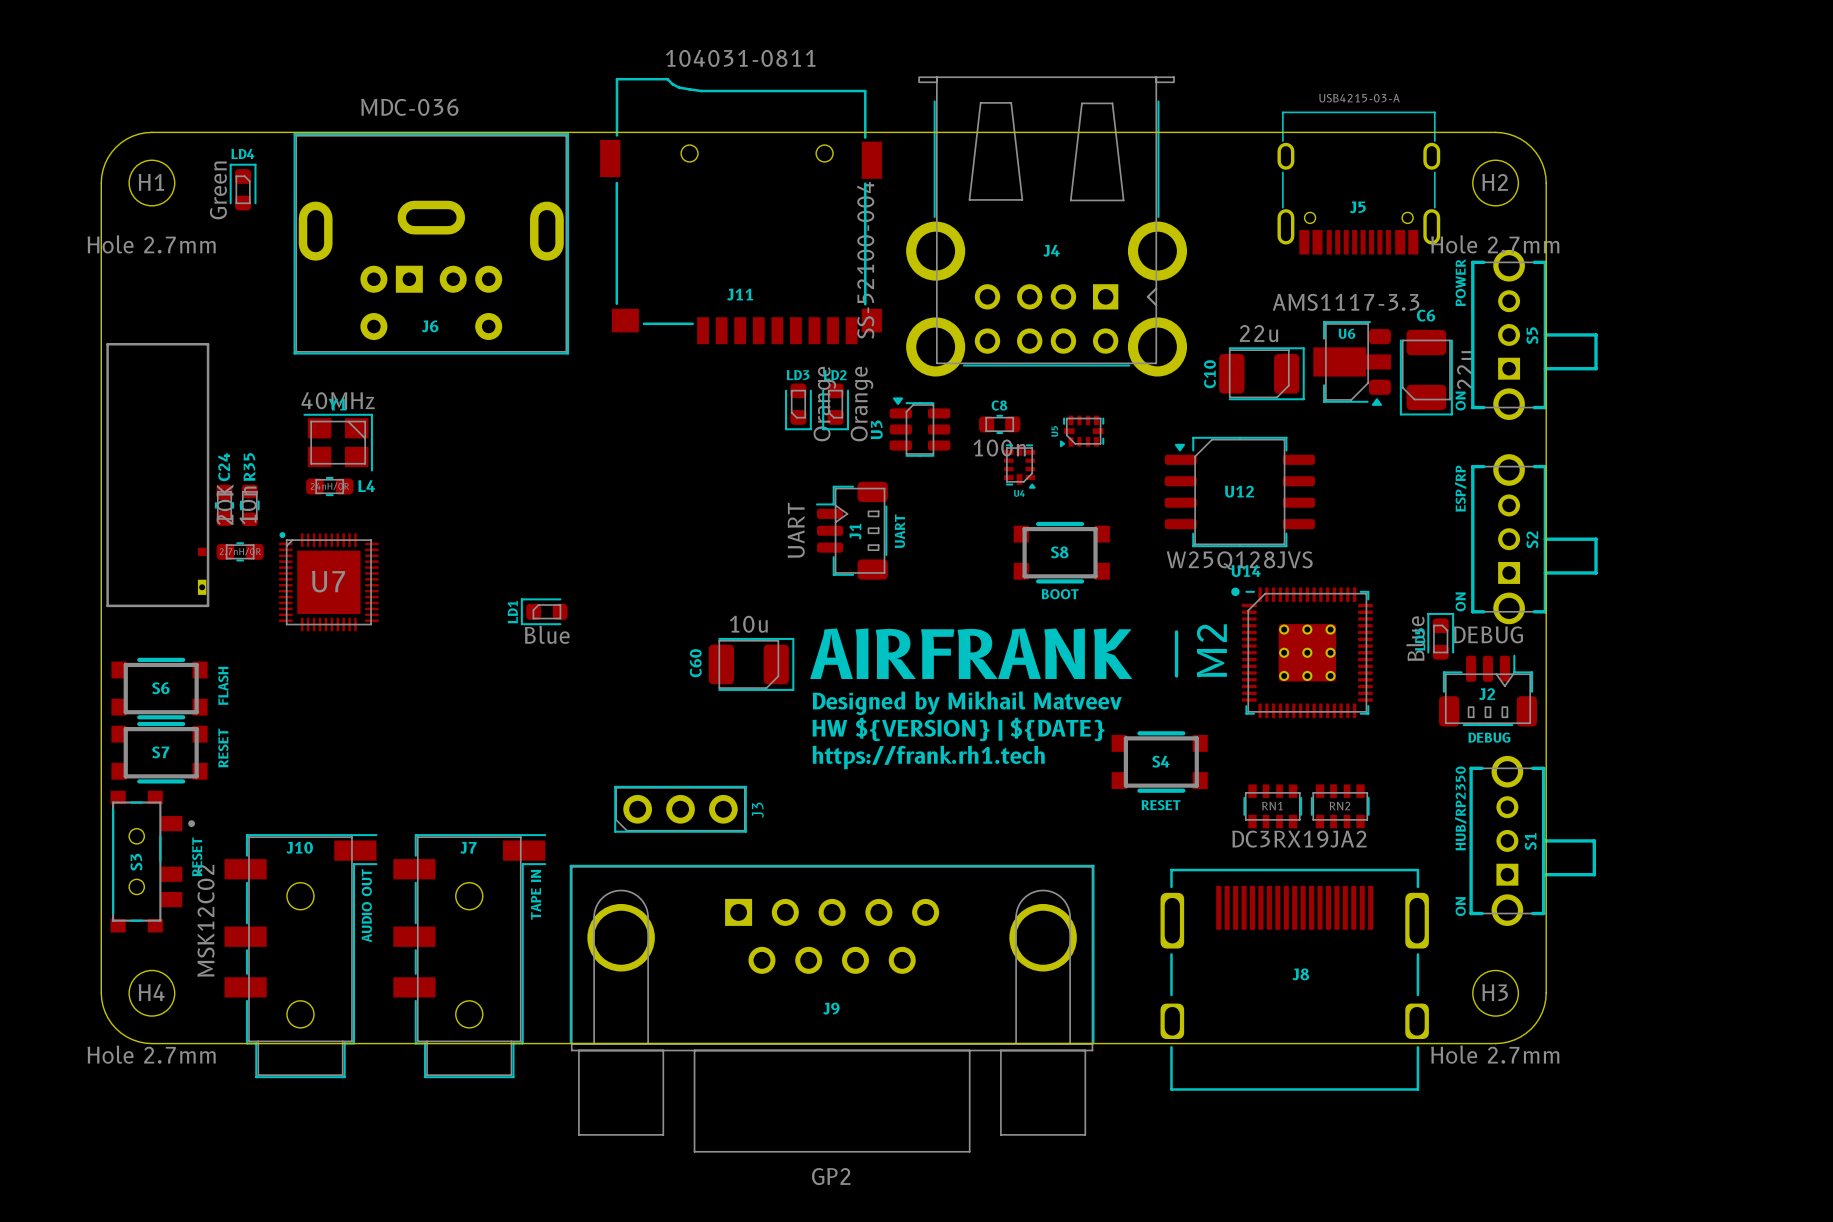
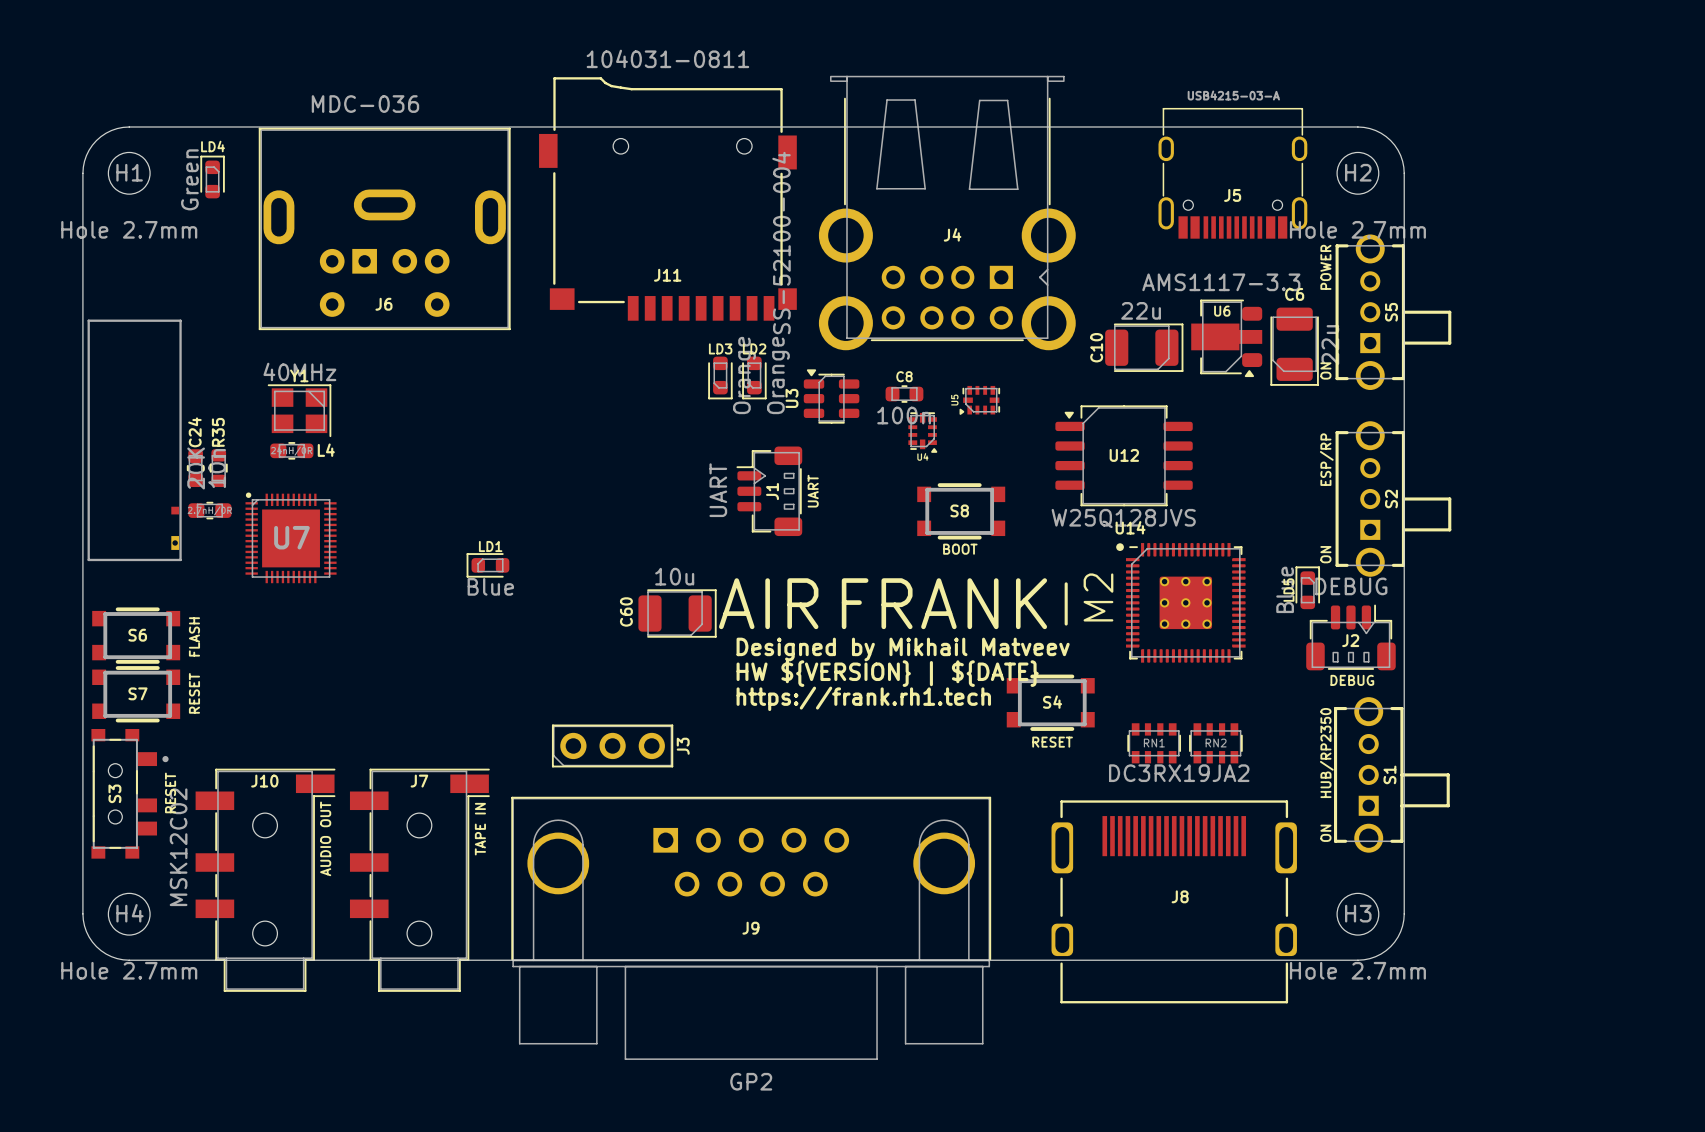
LD1 name rotation: 0° (512, 612) -> 90° clockwise (490, 546)
LD1 name position: LD1 (512, 612) -> LD1 (490, 546)

